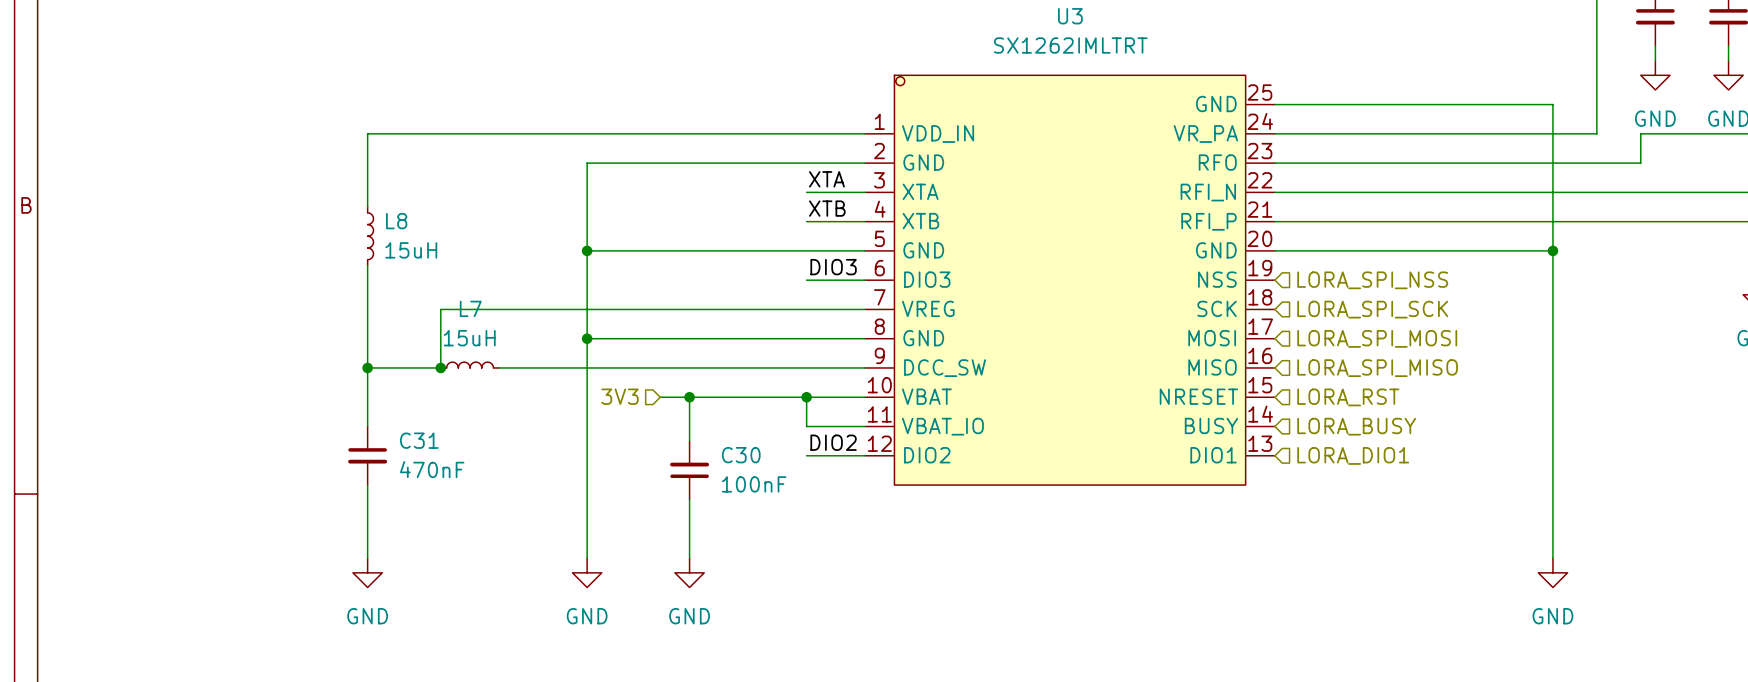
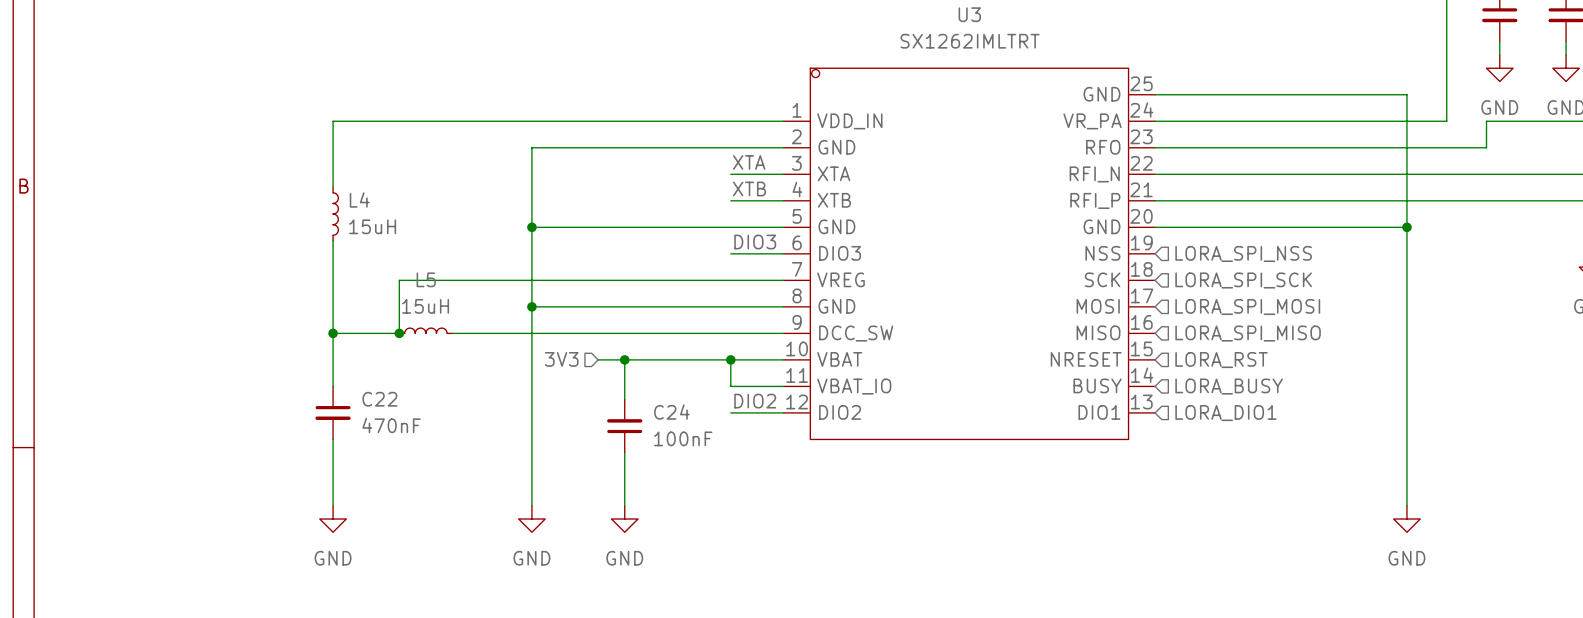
L8 name: L8 (396, 221) -> L4 (359, 199)
L7 name: L7 (470, 308) -> L5 (426, 279)
C31 name: C31 (419, 440) -> C22 (379, 399)
C30 name: C30 (741, 455) -> C24 (671, 412)

